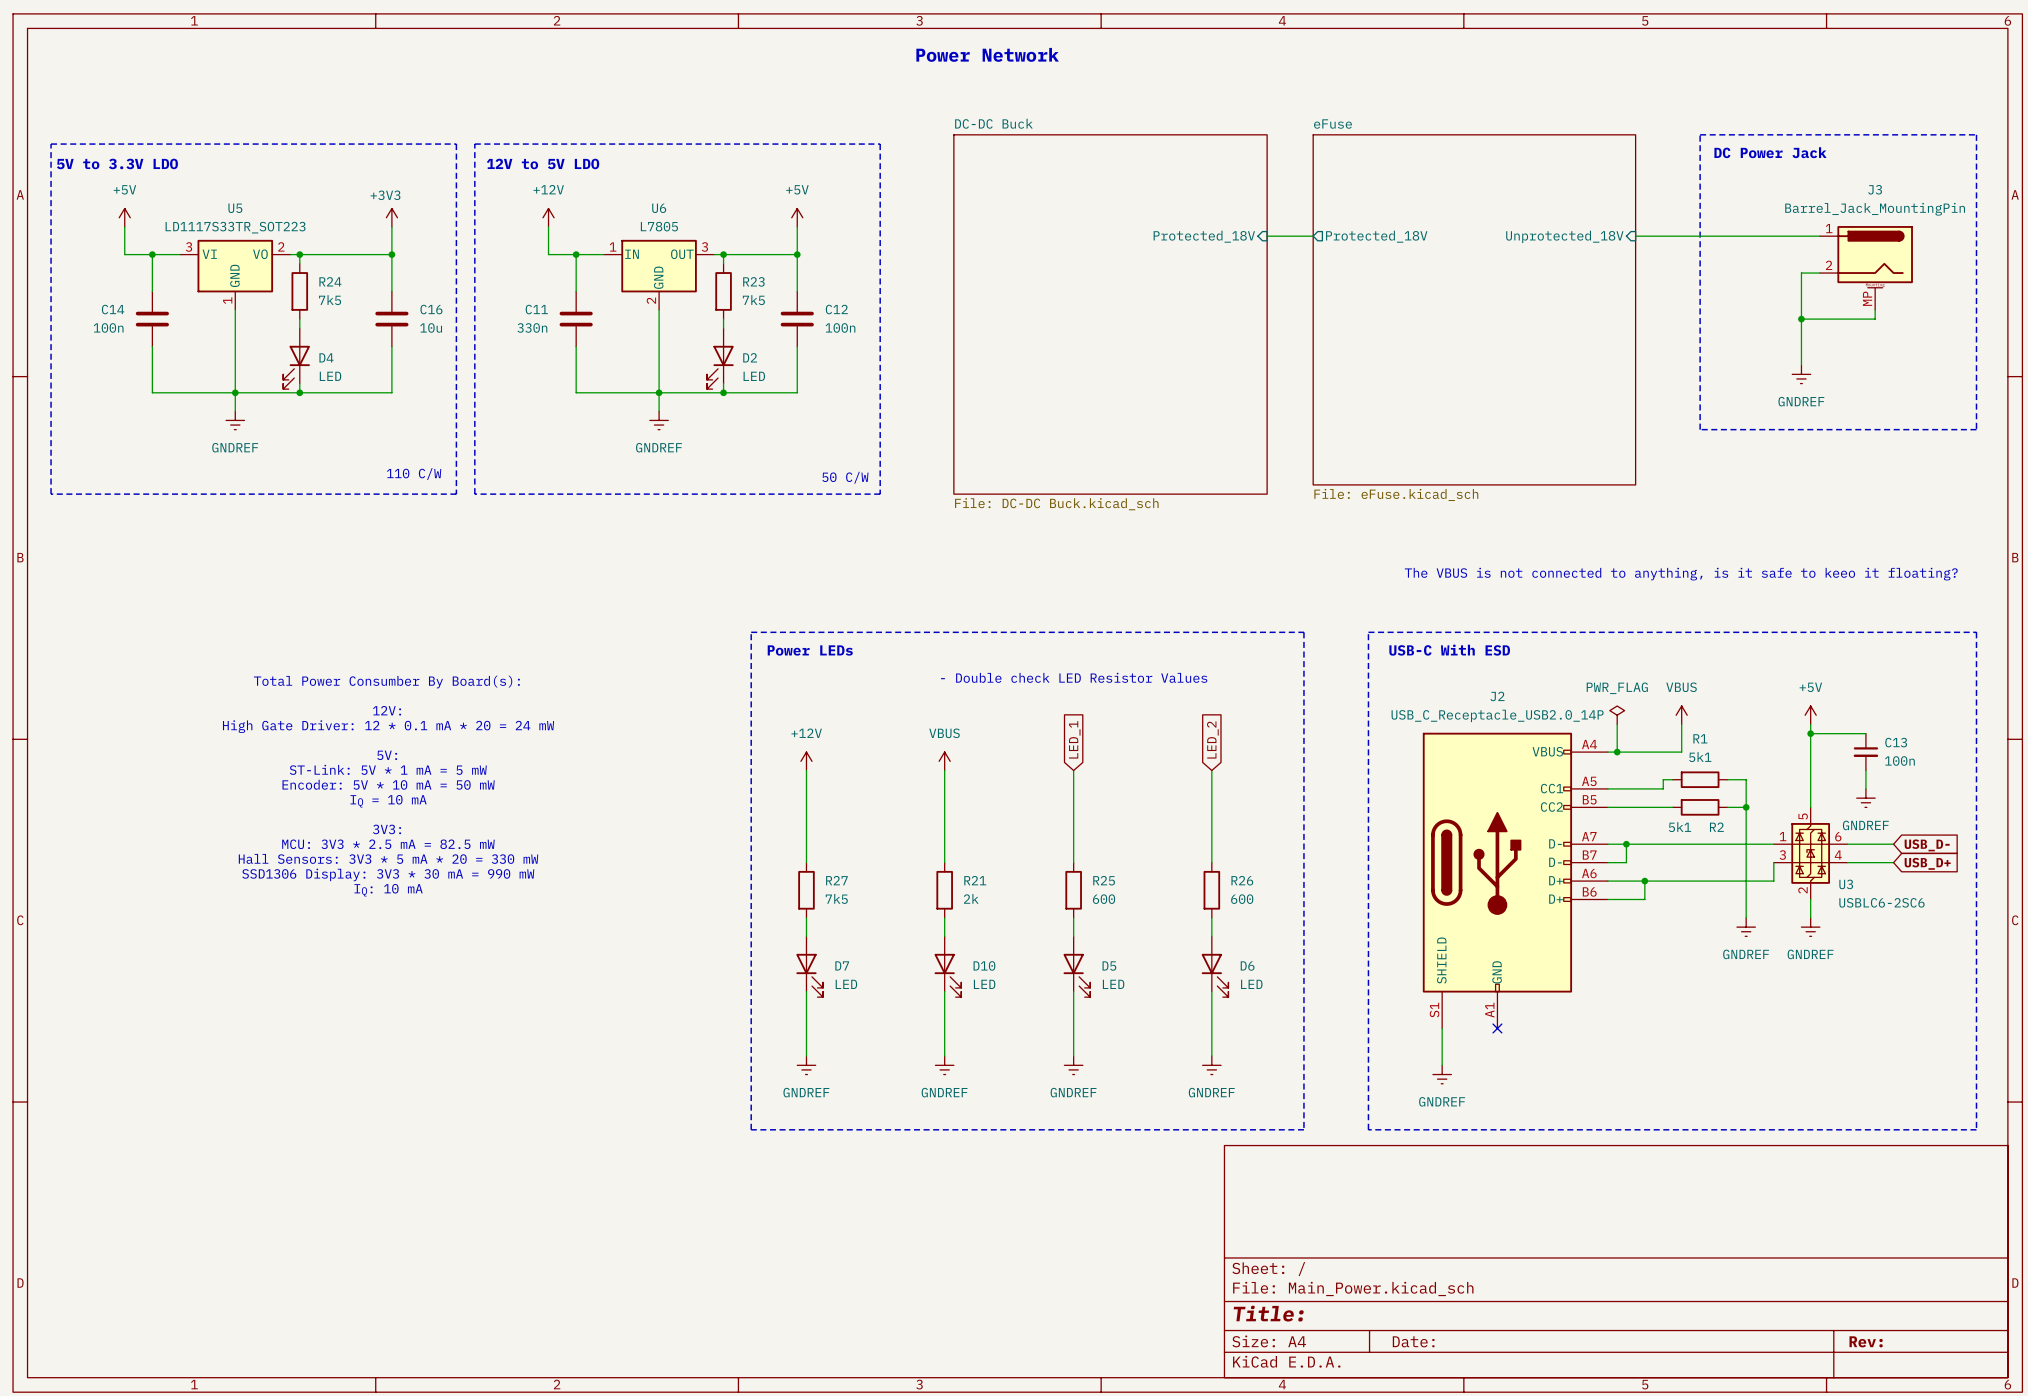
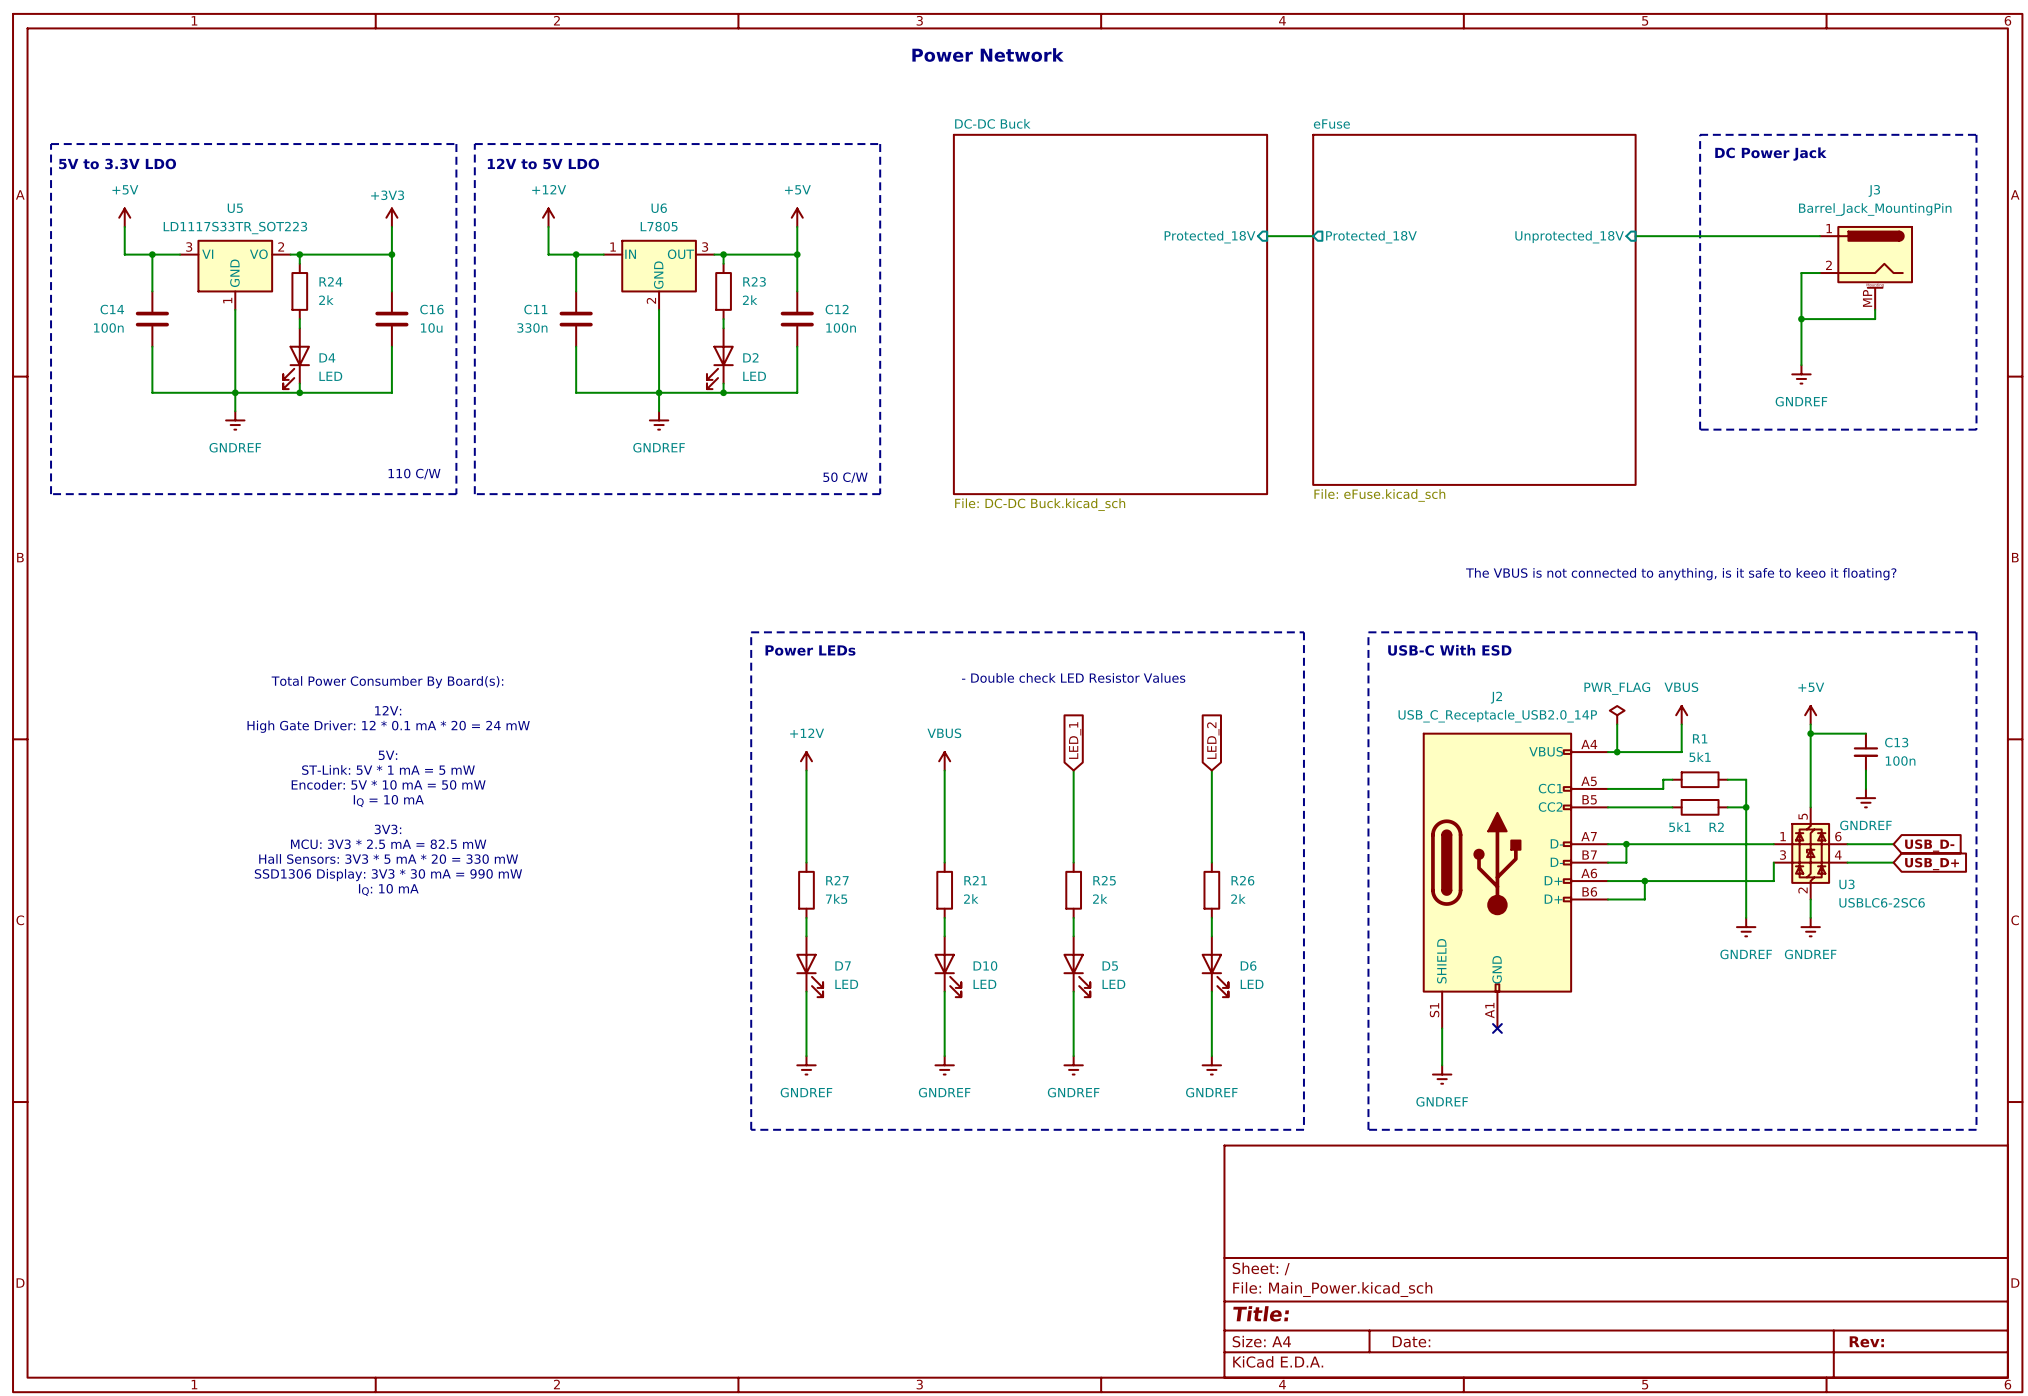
R24 value: 7k5 (330, 300) -> 2k (326, 300)
R23 value: 7k5 (753, 300) -> 2k (750, 300)
R25 value: 600 (1104, 899) -> 2k (1100, 898)
R26 value: 600 (1242, 899) -> 2k (1238, 898)

